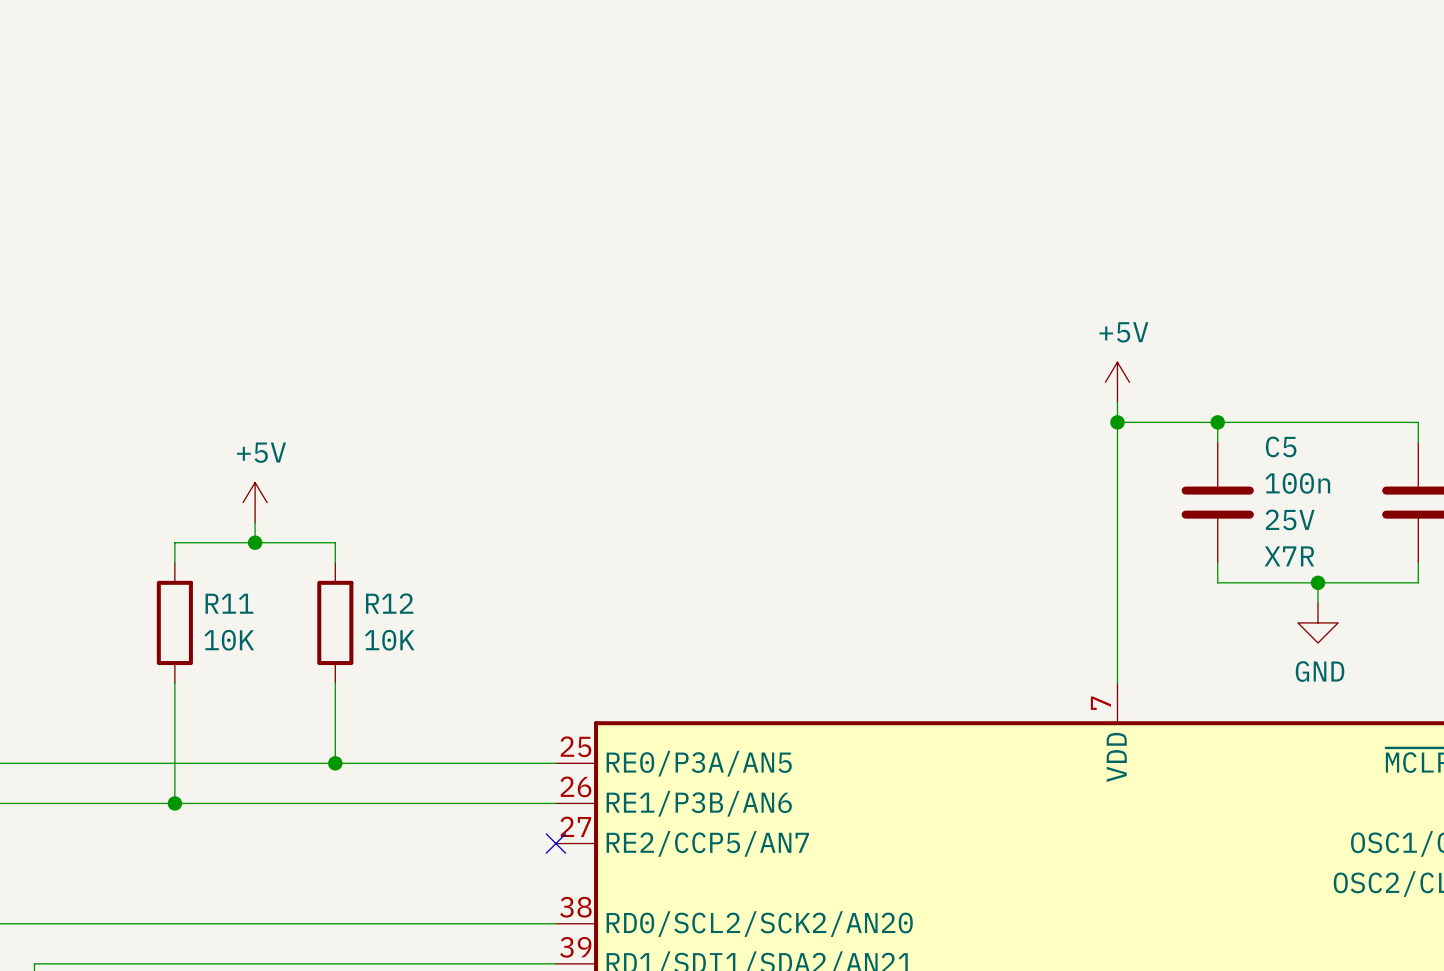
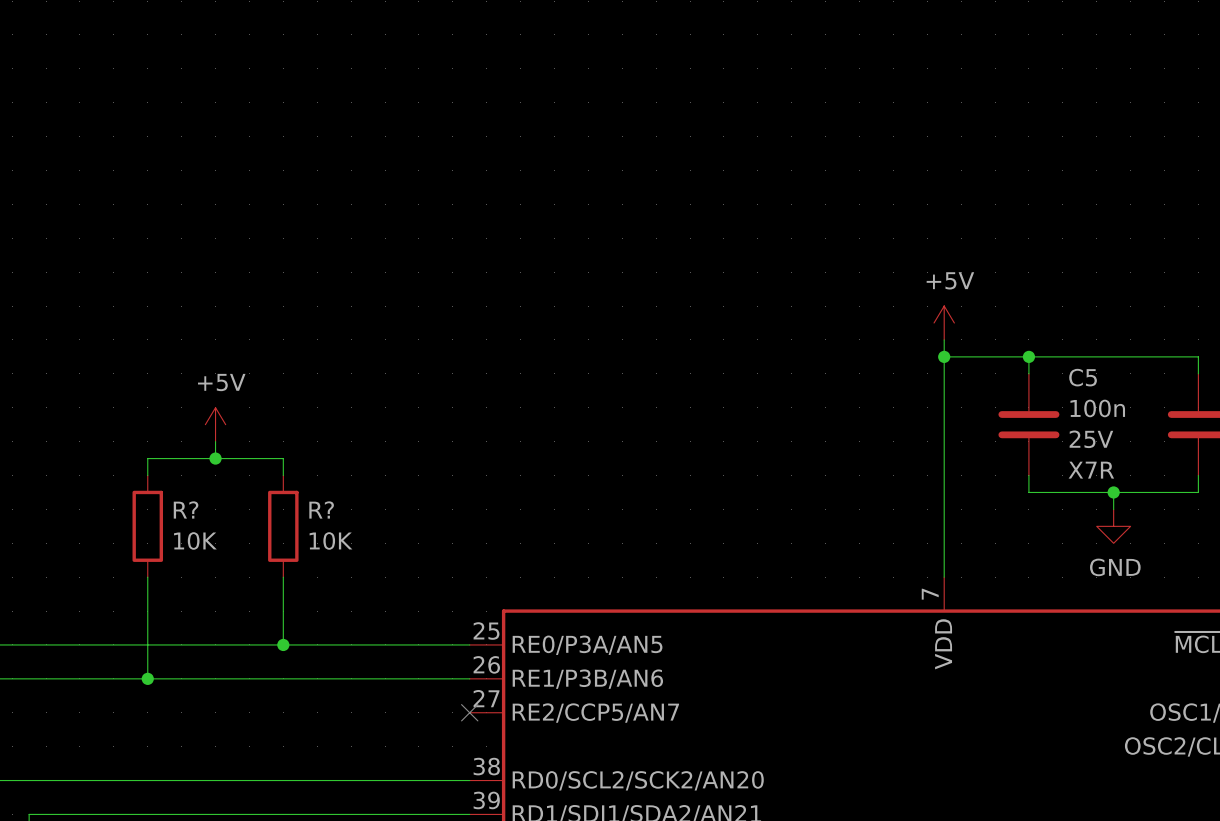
R11 name: R11 (229, 603) -> R? (186, 509)
R12 name: R12 (389, 603) -> R? (321, 509)

